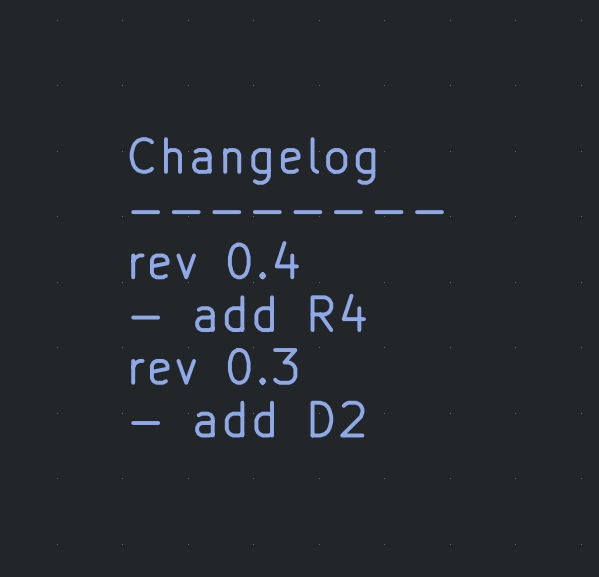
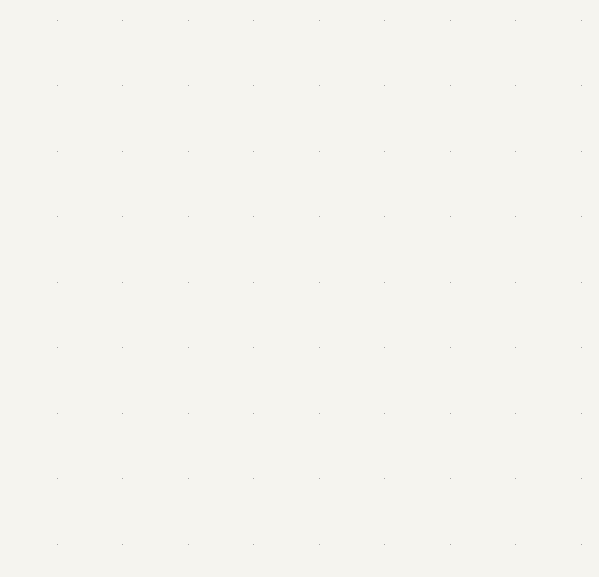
text: Changelog (252, 160) -> none
text: -------- (287, 212) -> none
text: rev 0.4 (215, 260) -> none
text: - add R4 (248, 312) -> none
text: rev 0.3 (214, 366) -> none
text: - add D2 (247, 419) -> none

